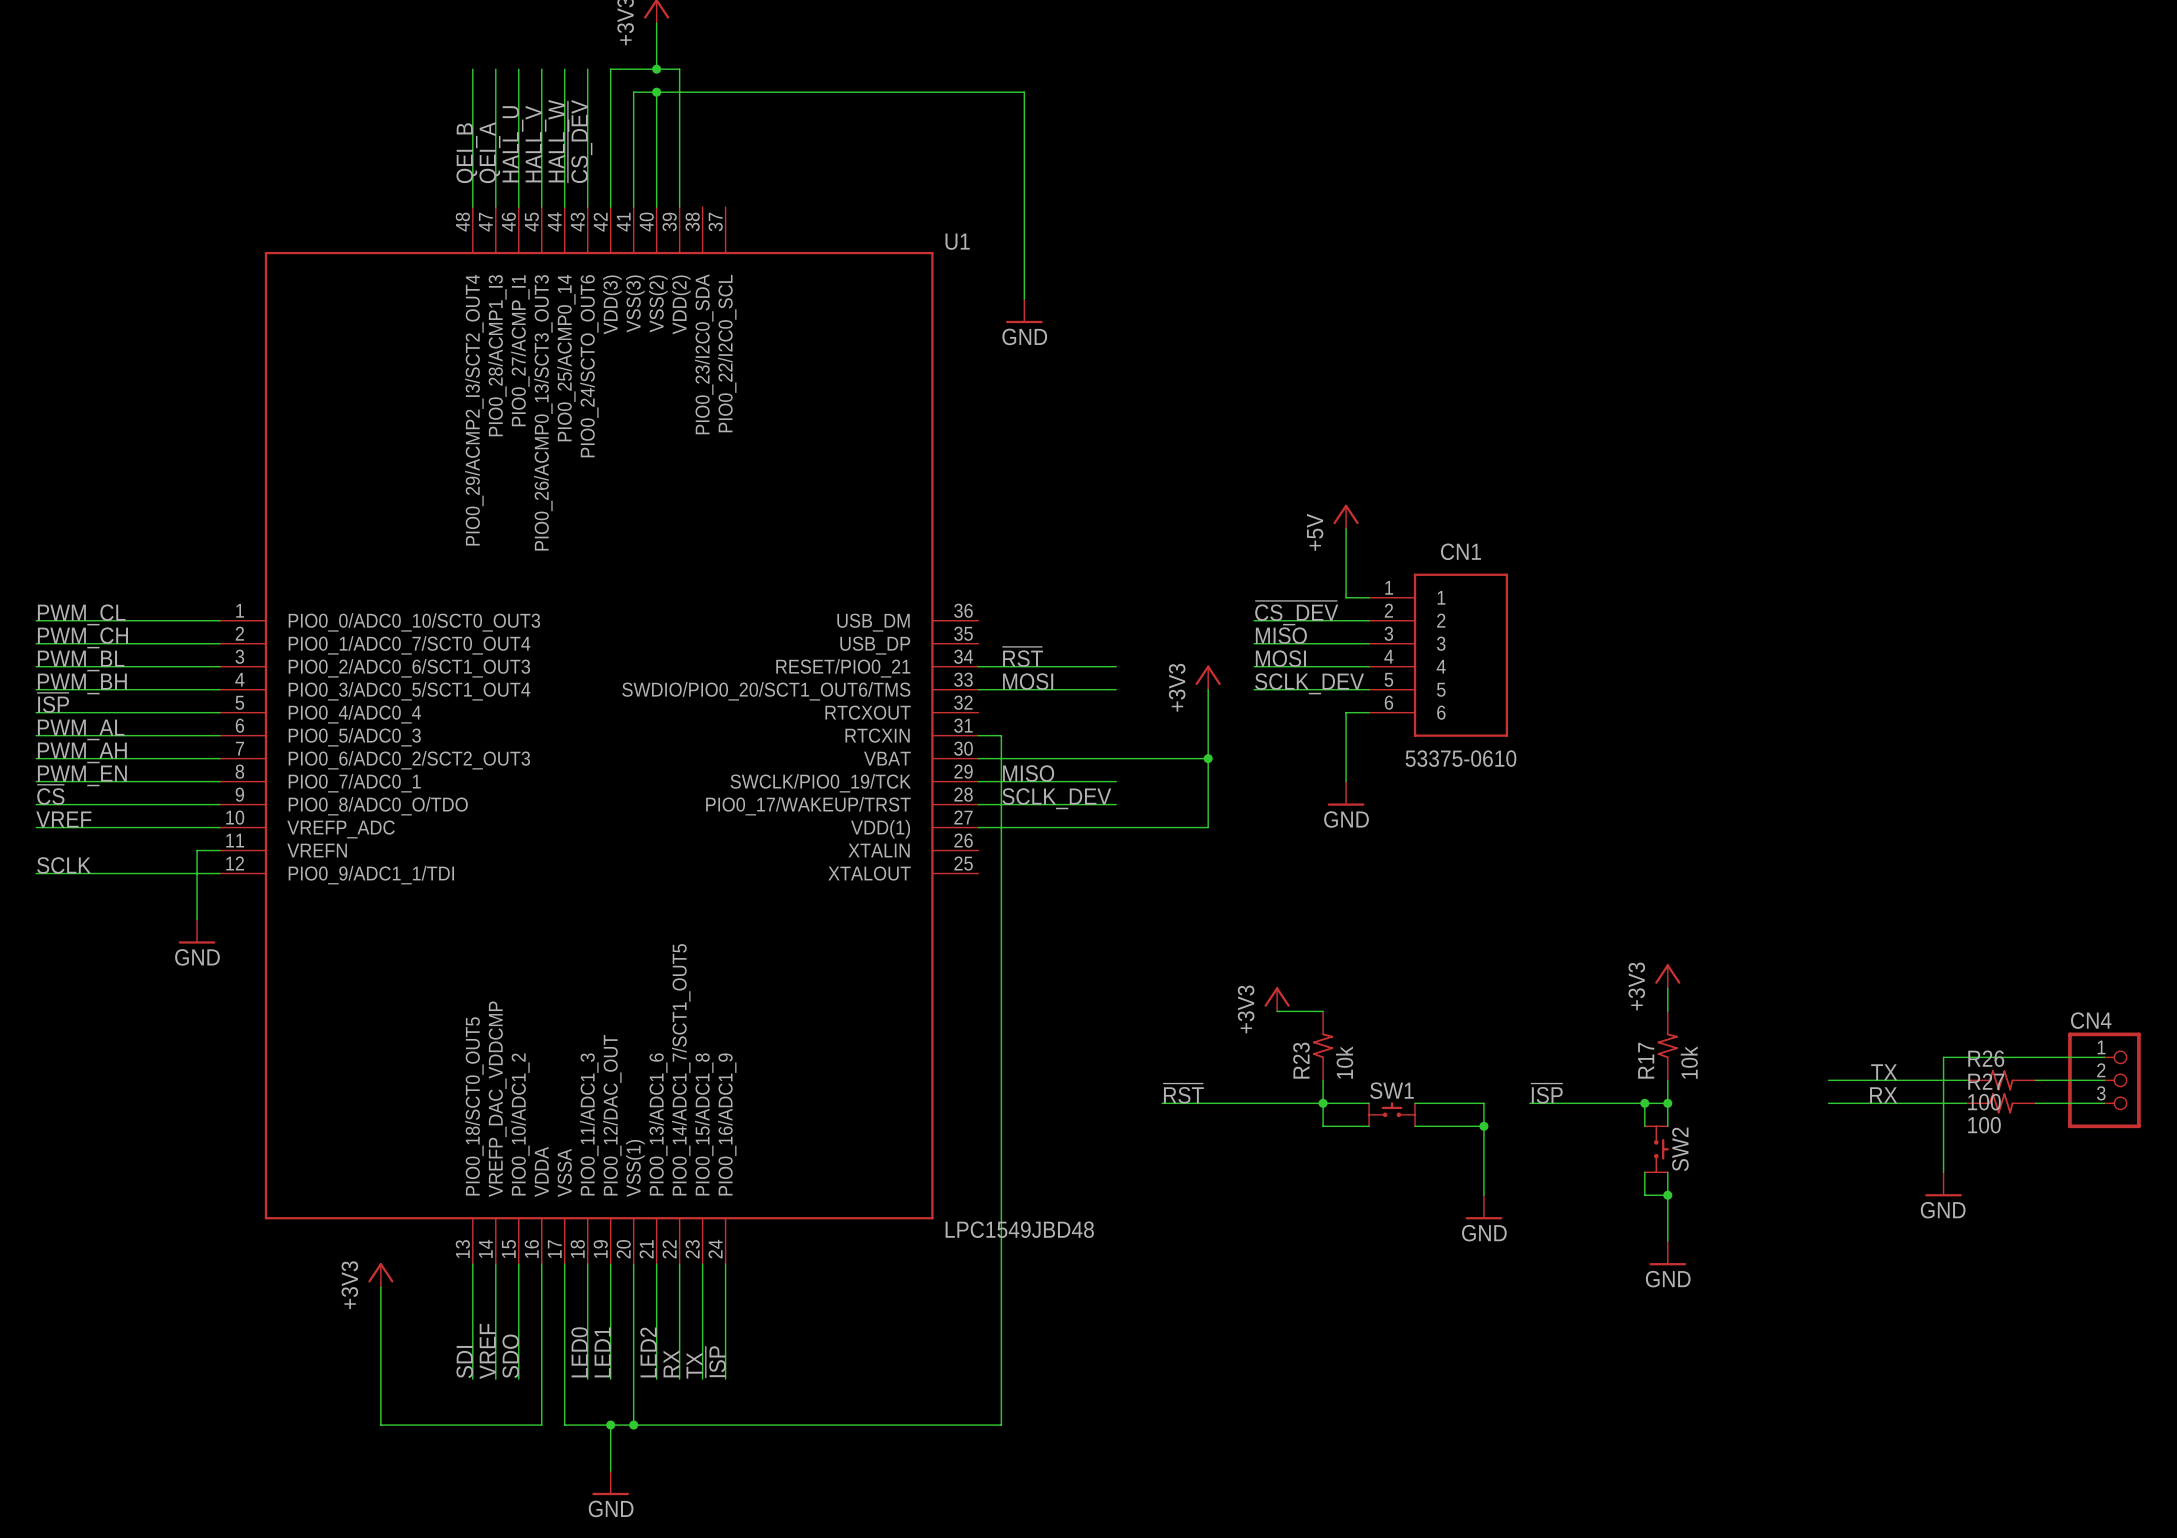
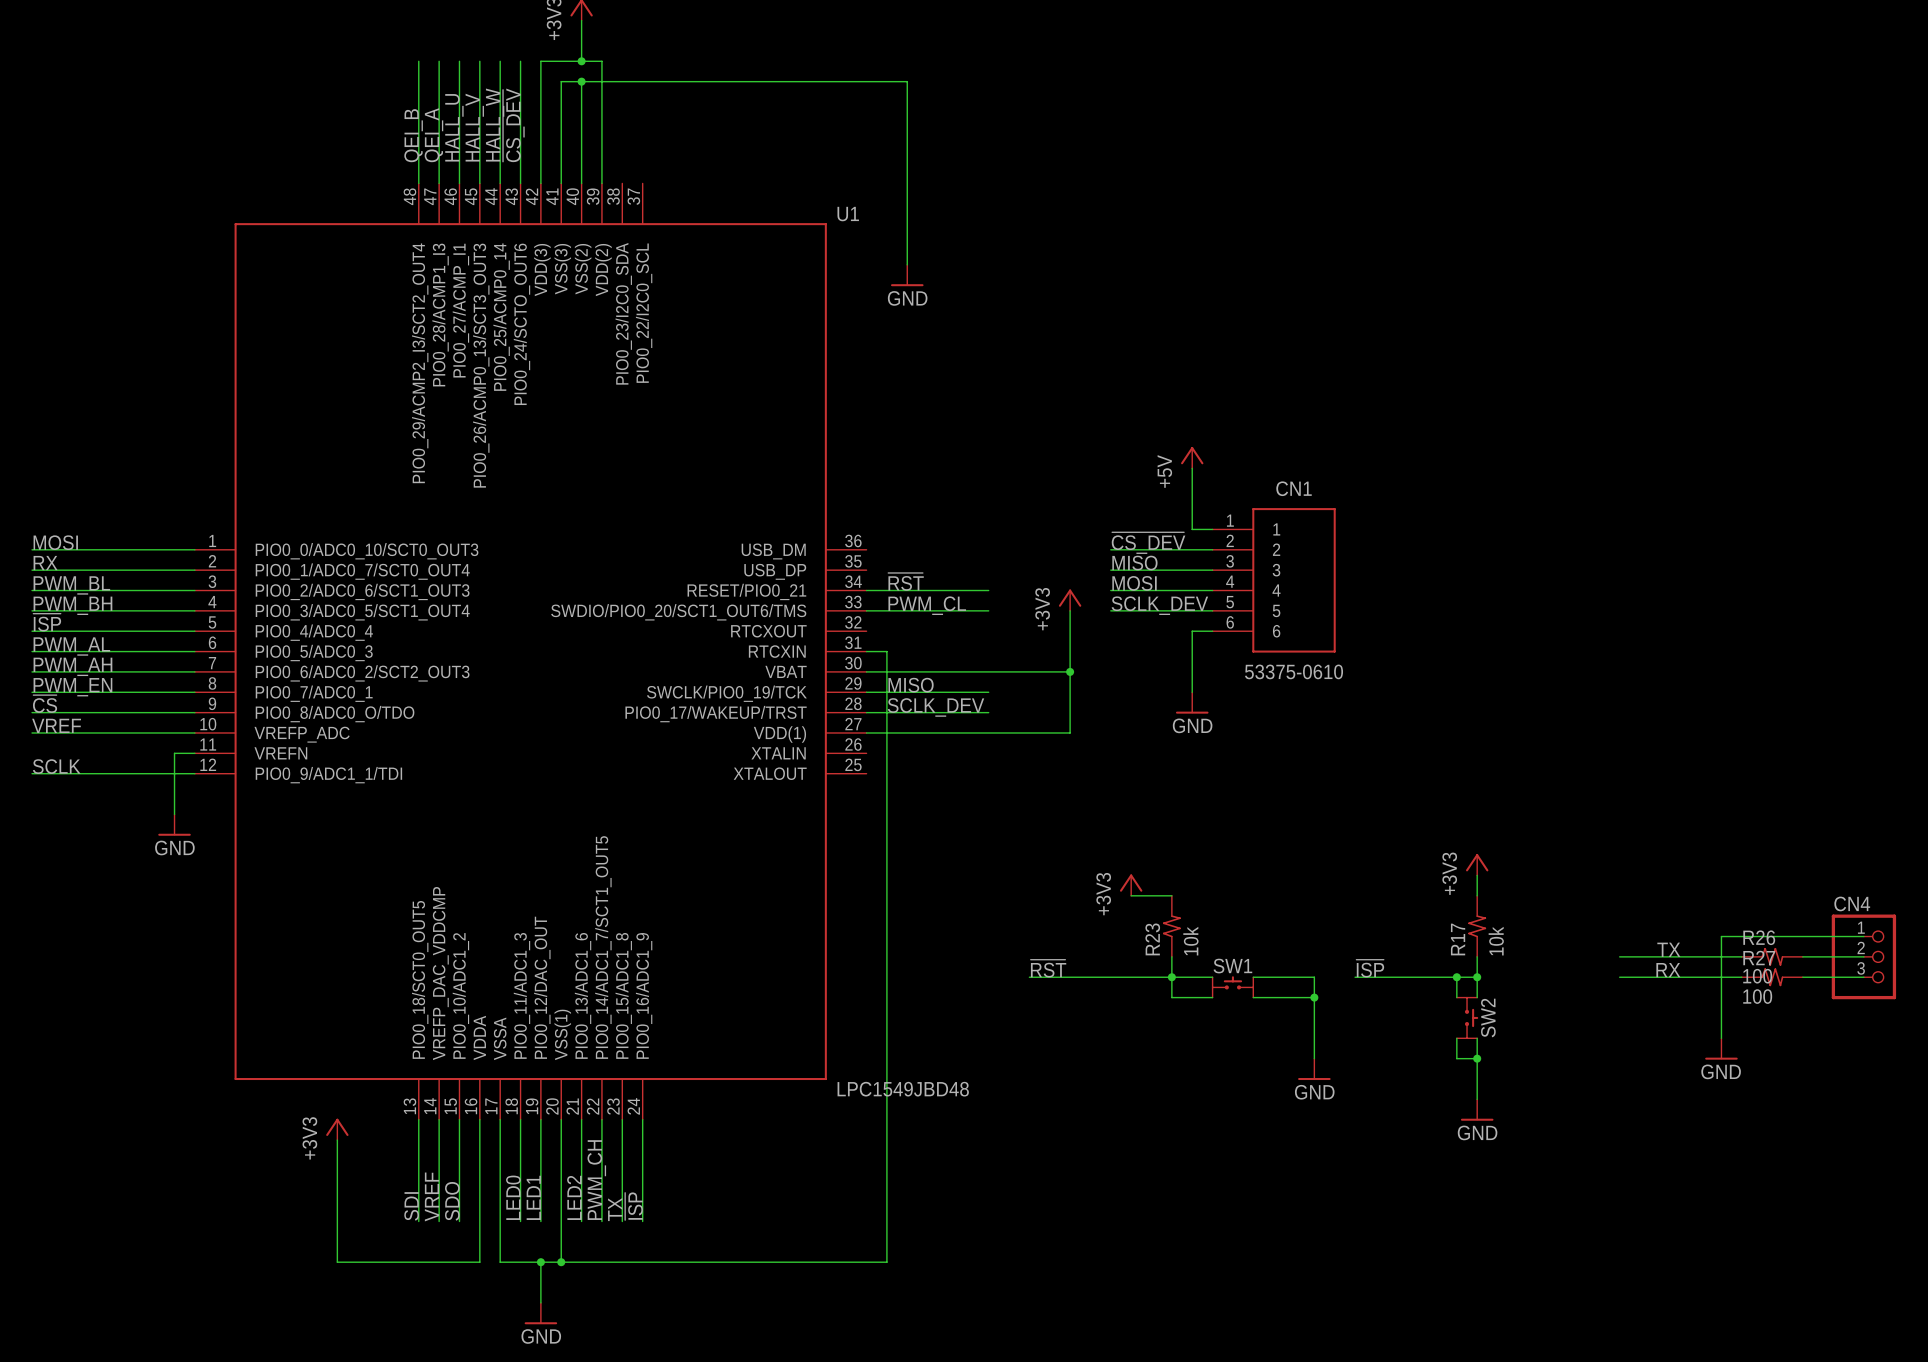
label: PWM_CL (81, 614) -> MOSI (55, 542)
label: PWM_CH (82, 637) -> RX (45, 563)
label: MOSI (1028, 681) -> PWM_CL (927, 605)
label: RX (671, 1363) -> PWM_CH (596, 1180)

